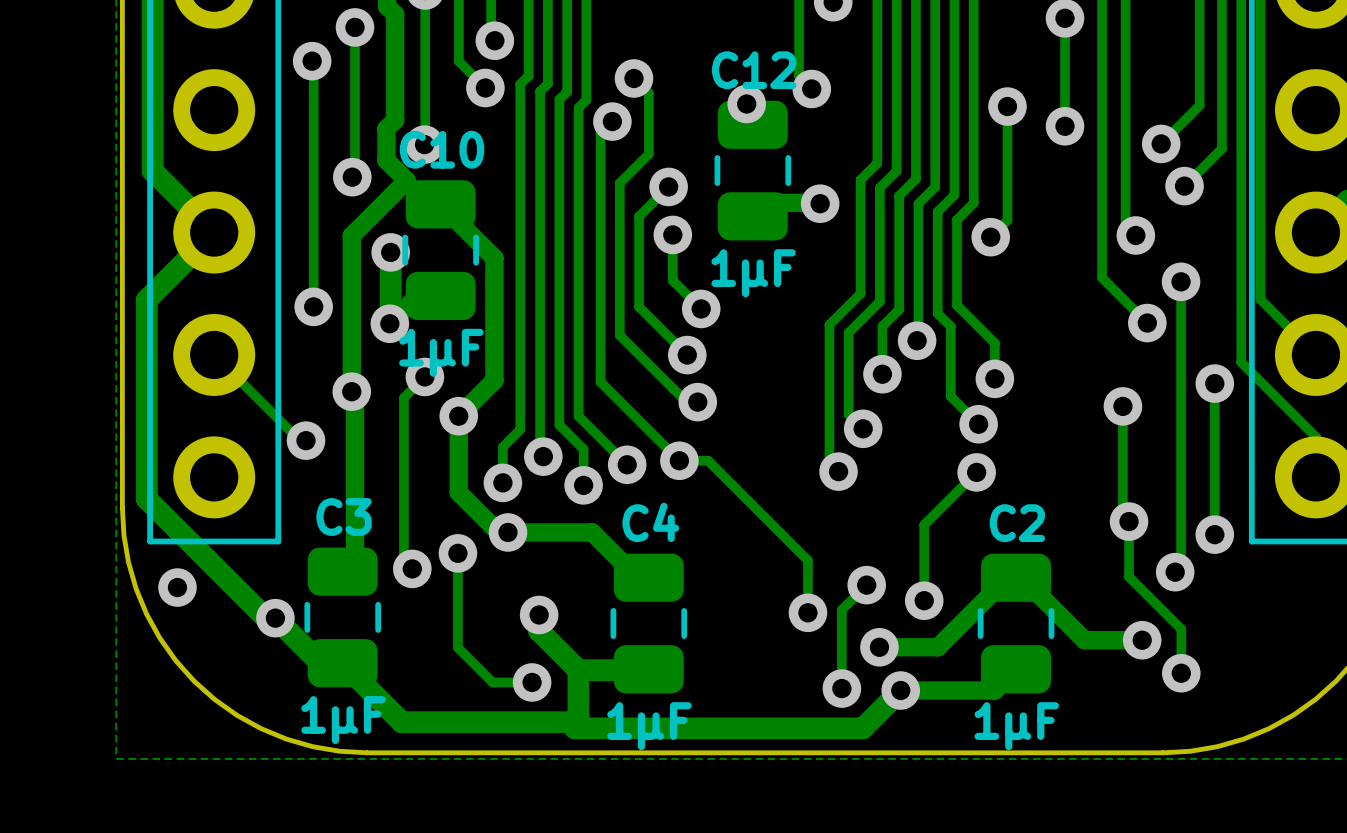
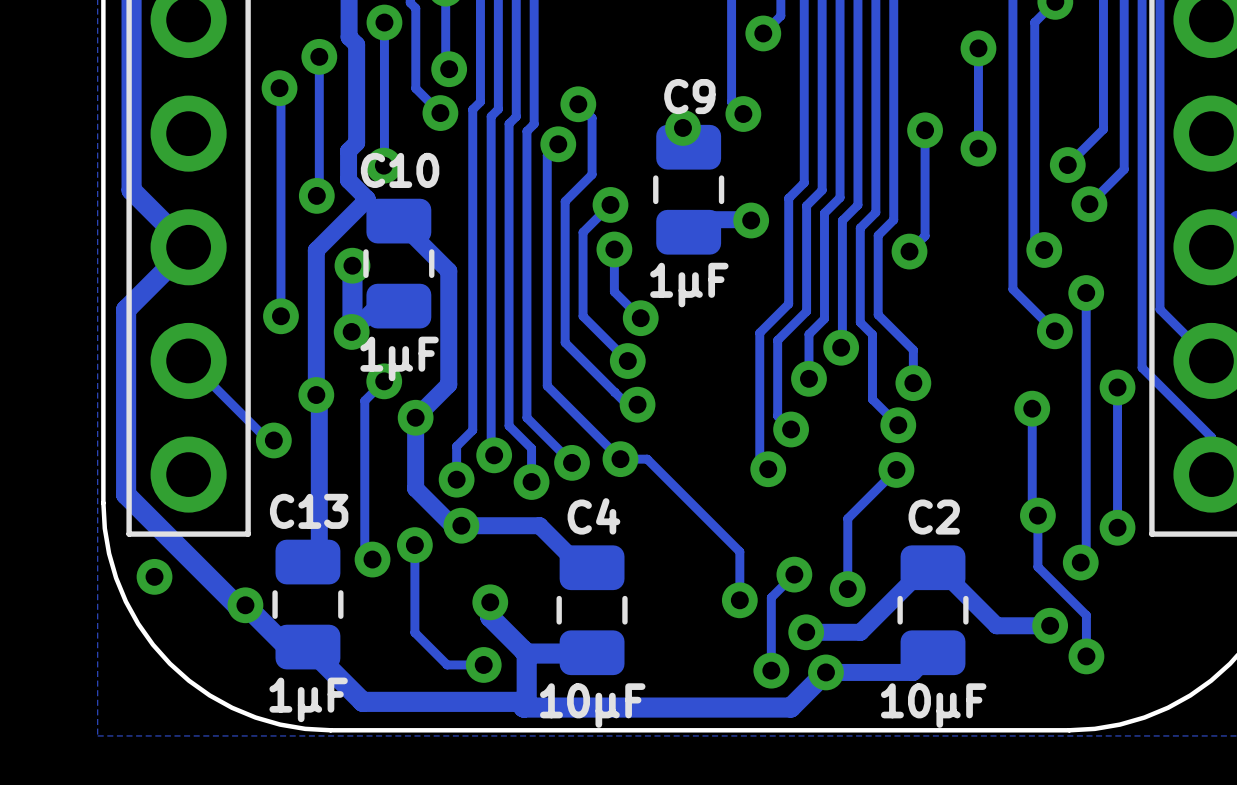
C12 name: C12 (754, 70) -> C9 (689, 96)
C3 name: C3 (344, 517) -> C13 (309, 511)
C4 value: 1μF (649, 726) -> 10μF (592, 705)
C2 value: 1μF (1016, 726) -> 10μF (933, 705)

